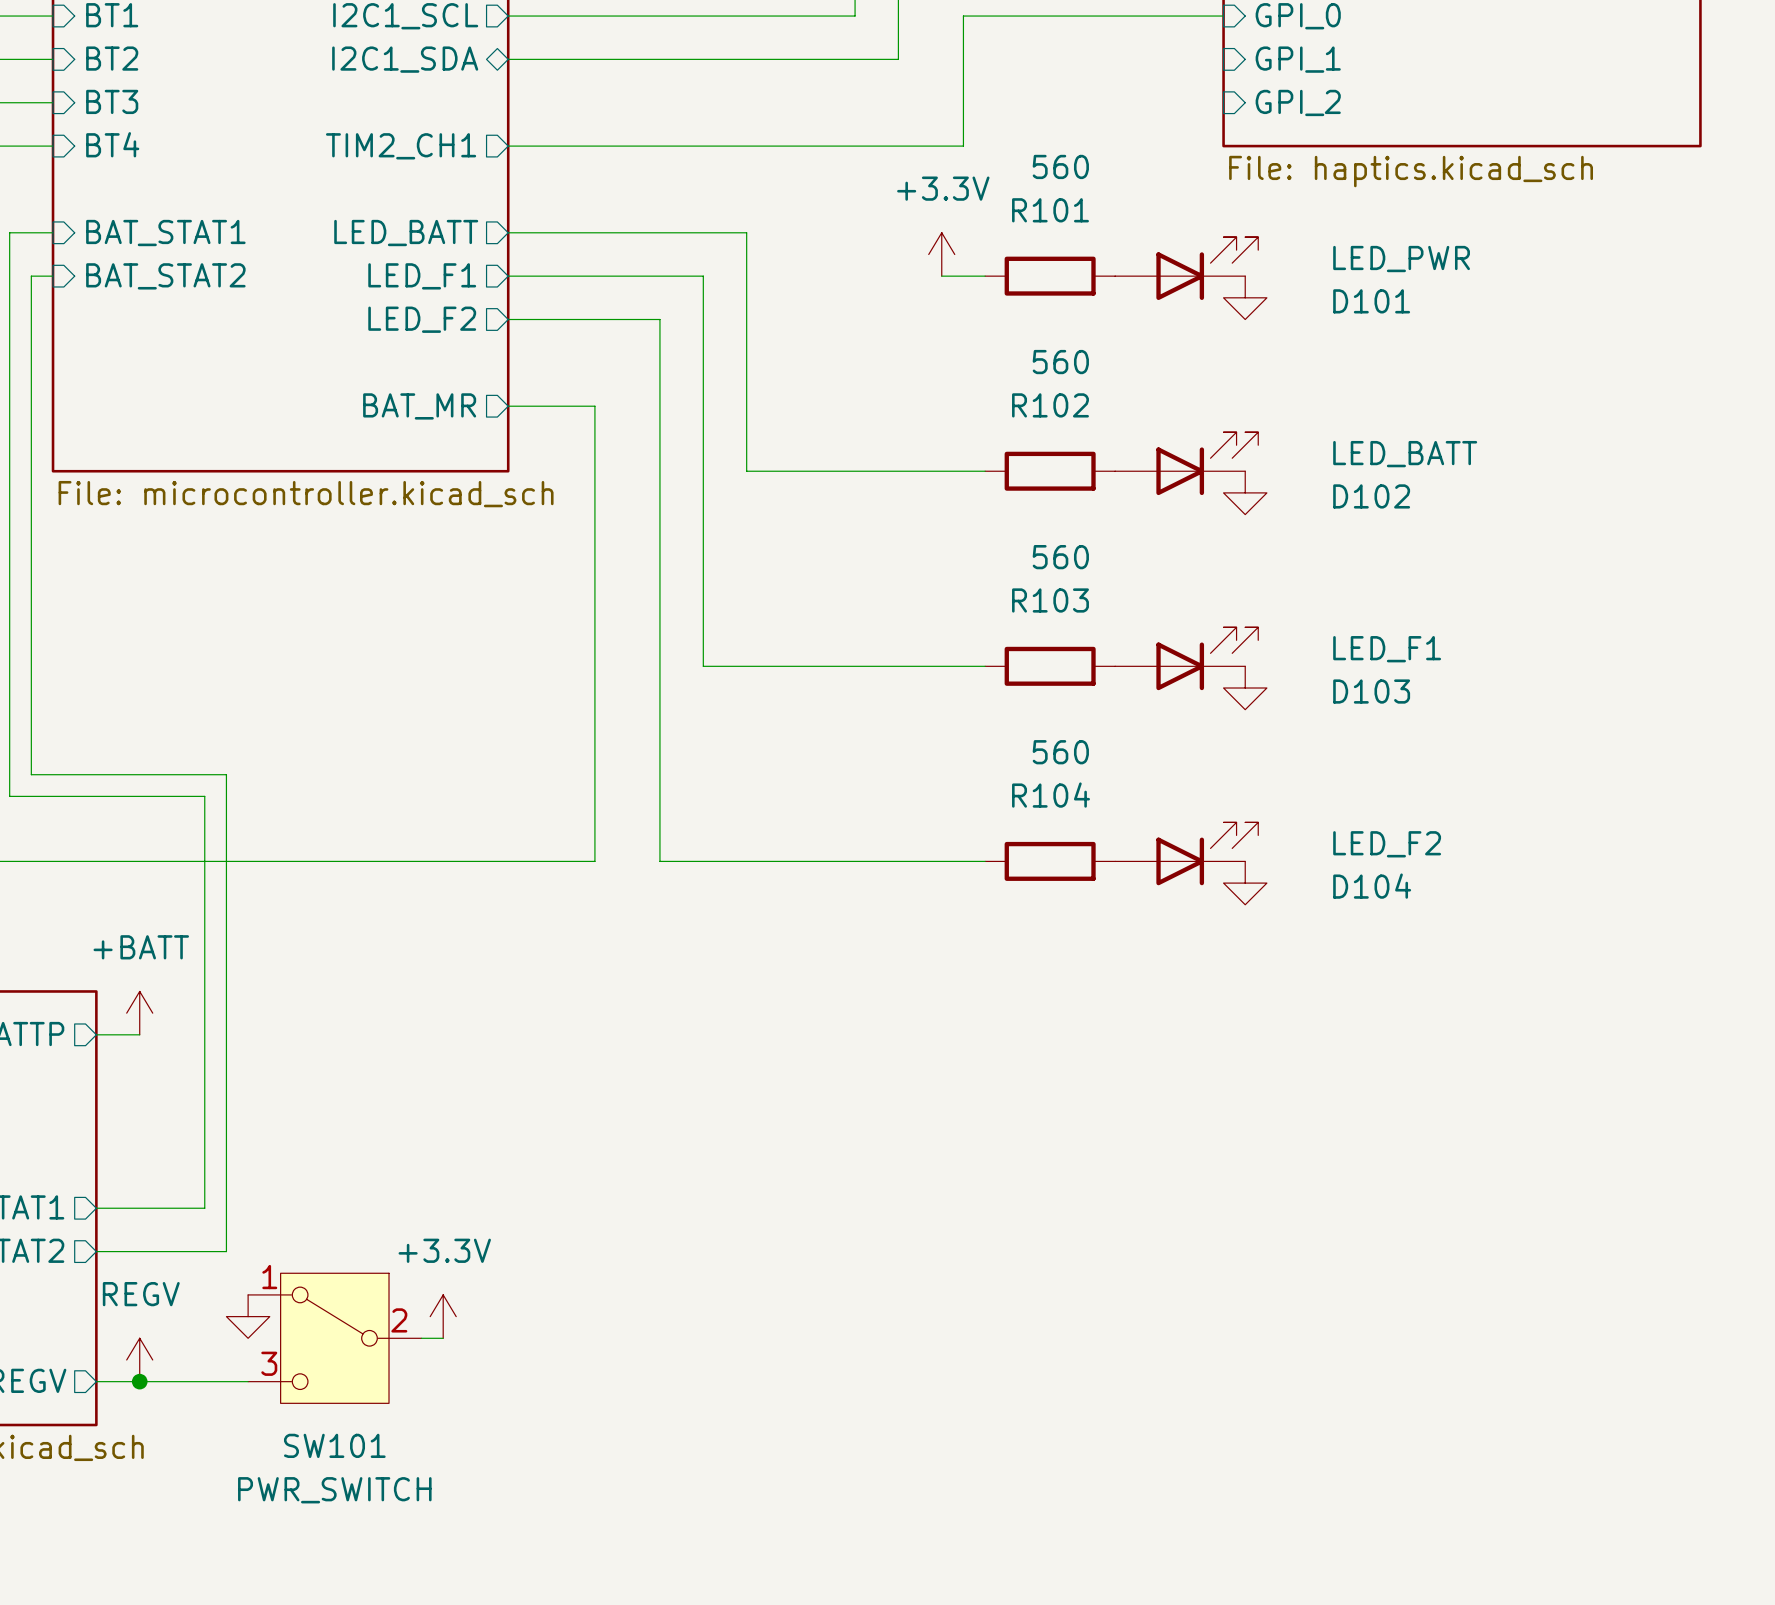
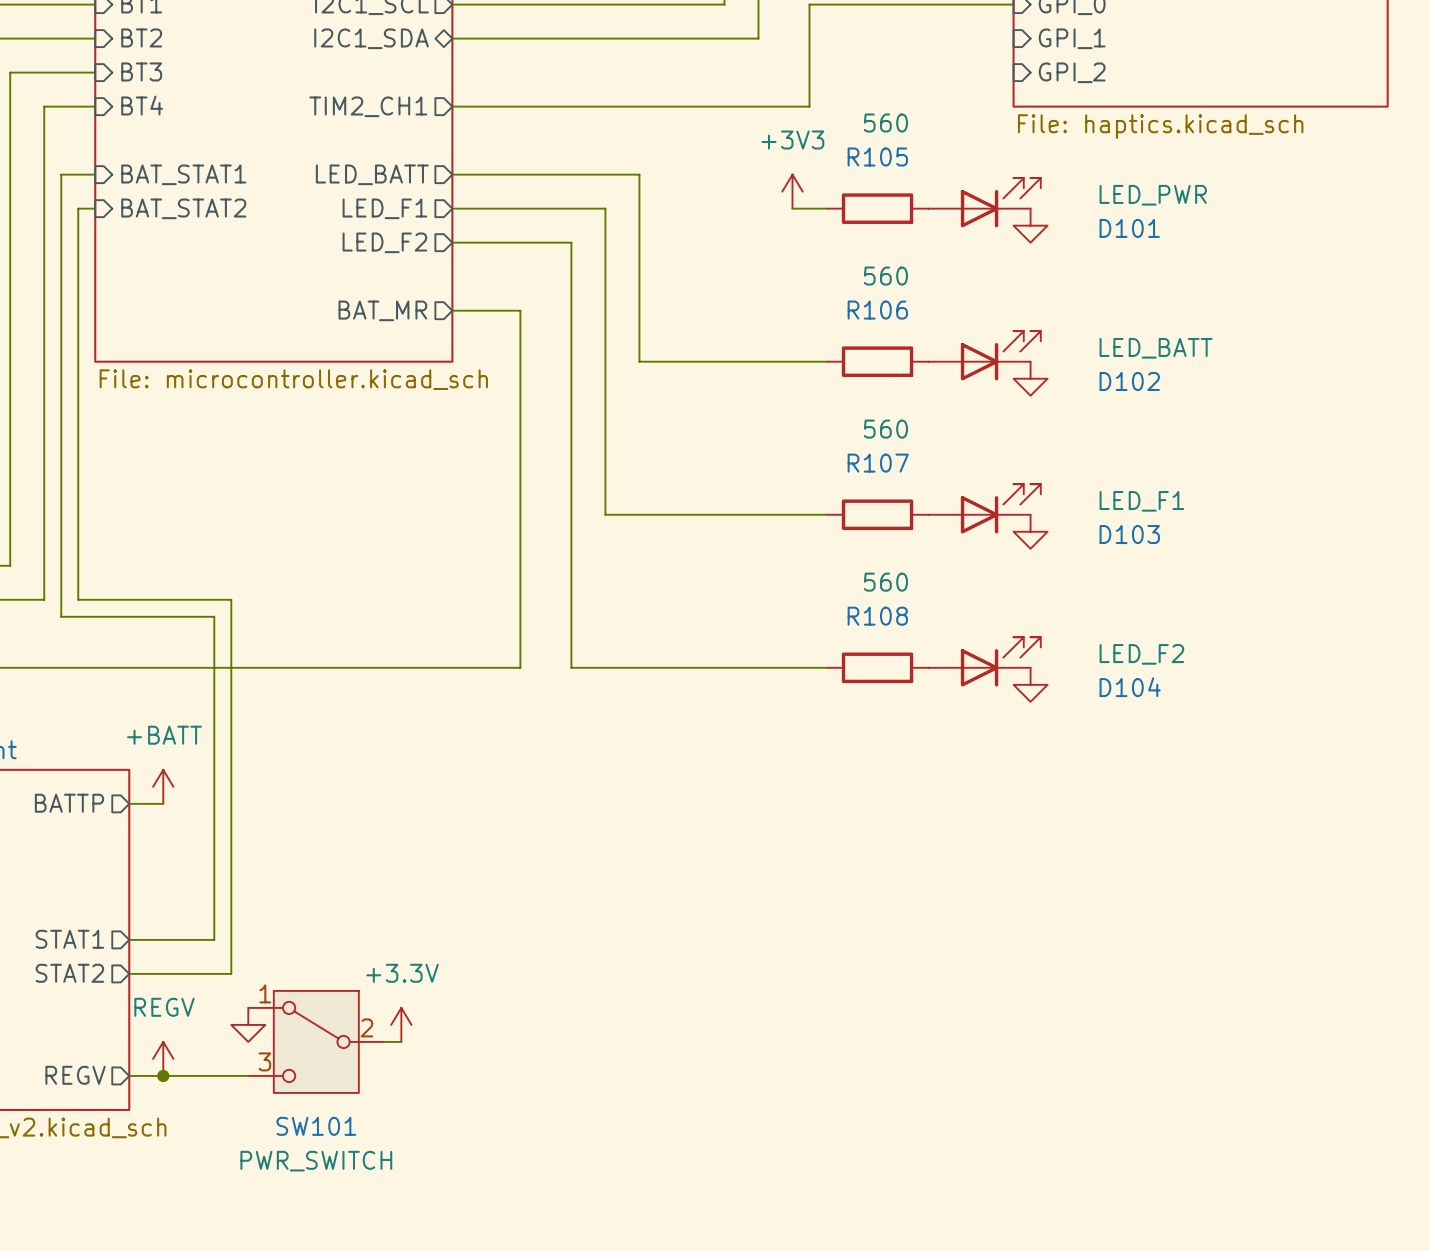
R101 name: R101 (1050, 210) -> R105 (877, 157)
power symbol: +3.3V (941, 254) -> +3V3 (792, 191)
R102 name: R102 (1050, 405) -> R106 (877, 310)
R103 name: R103 (1050, 600) -> R107 (878, 463)
R104 name: R104 (1051, 795) -> R108 (877, 616)

